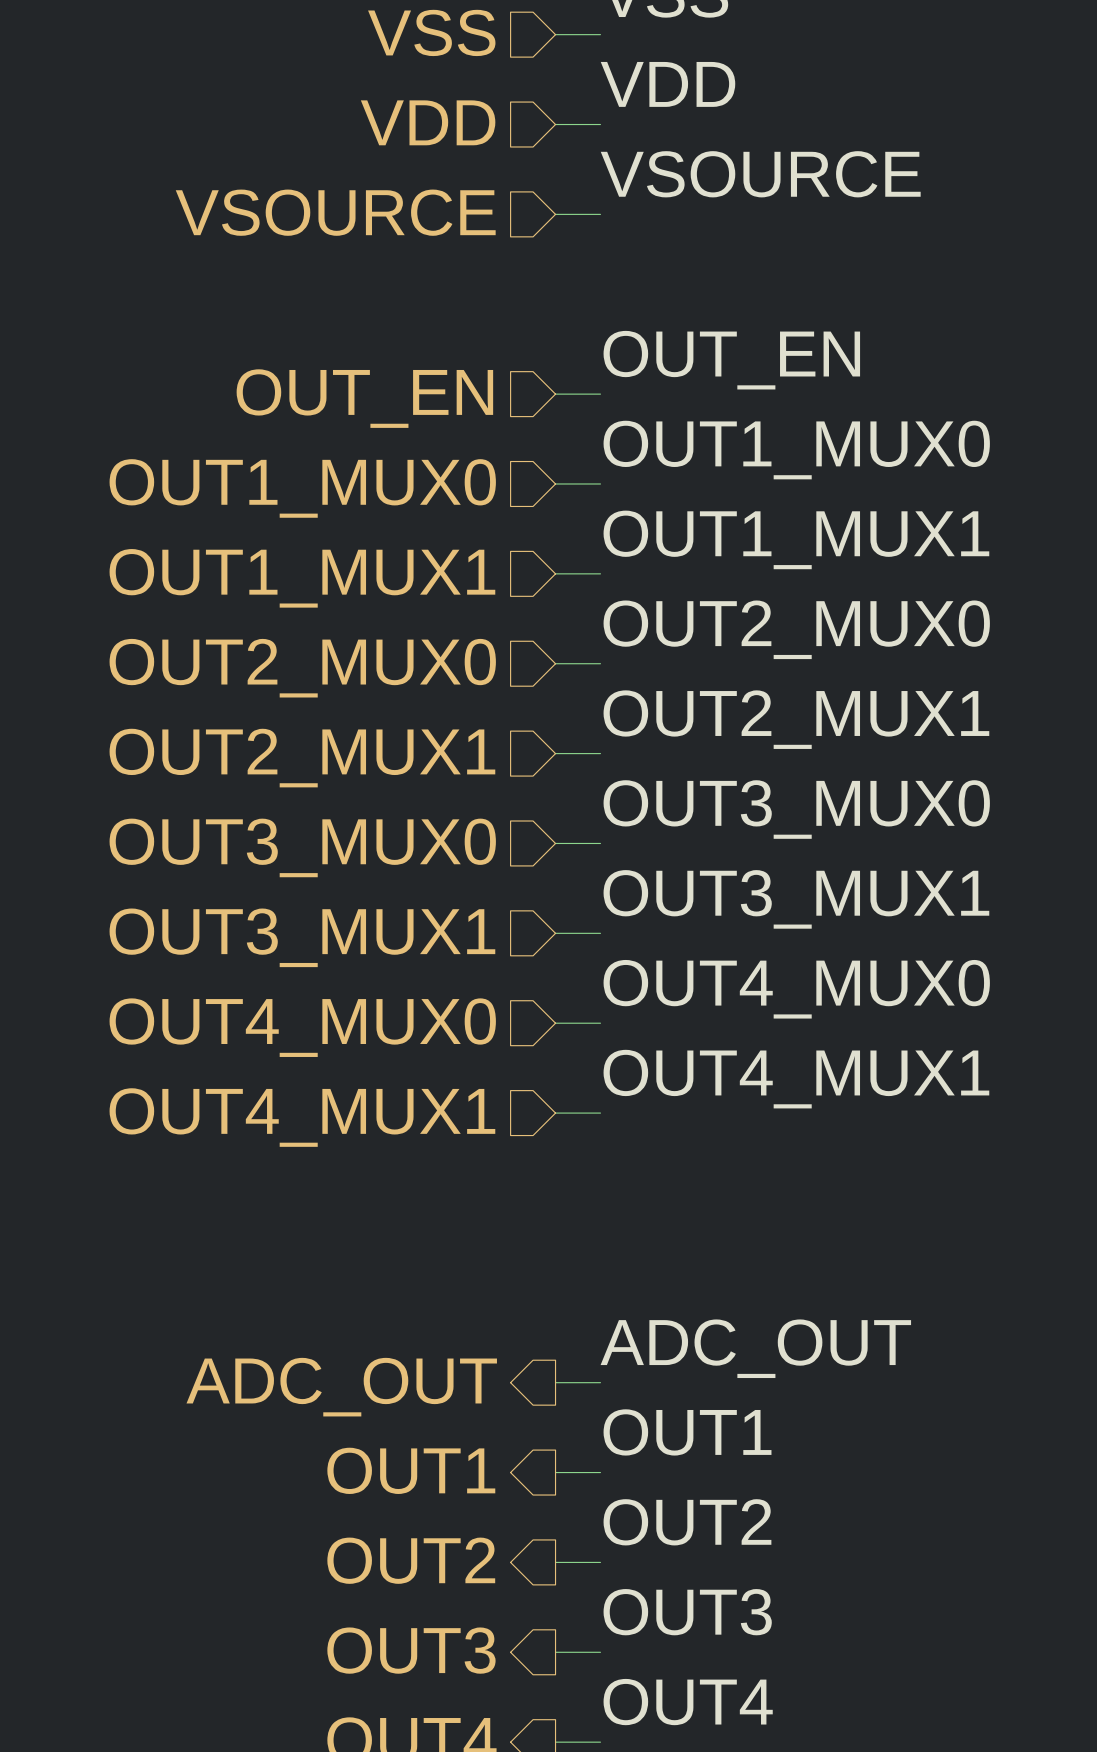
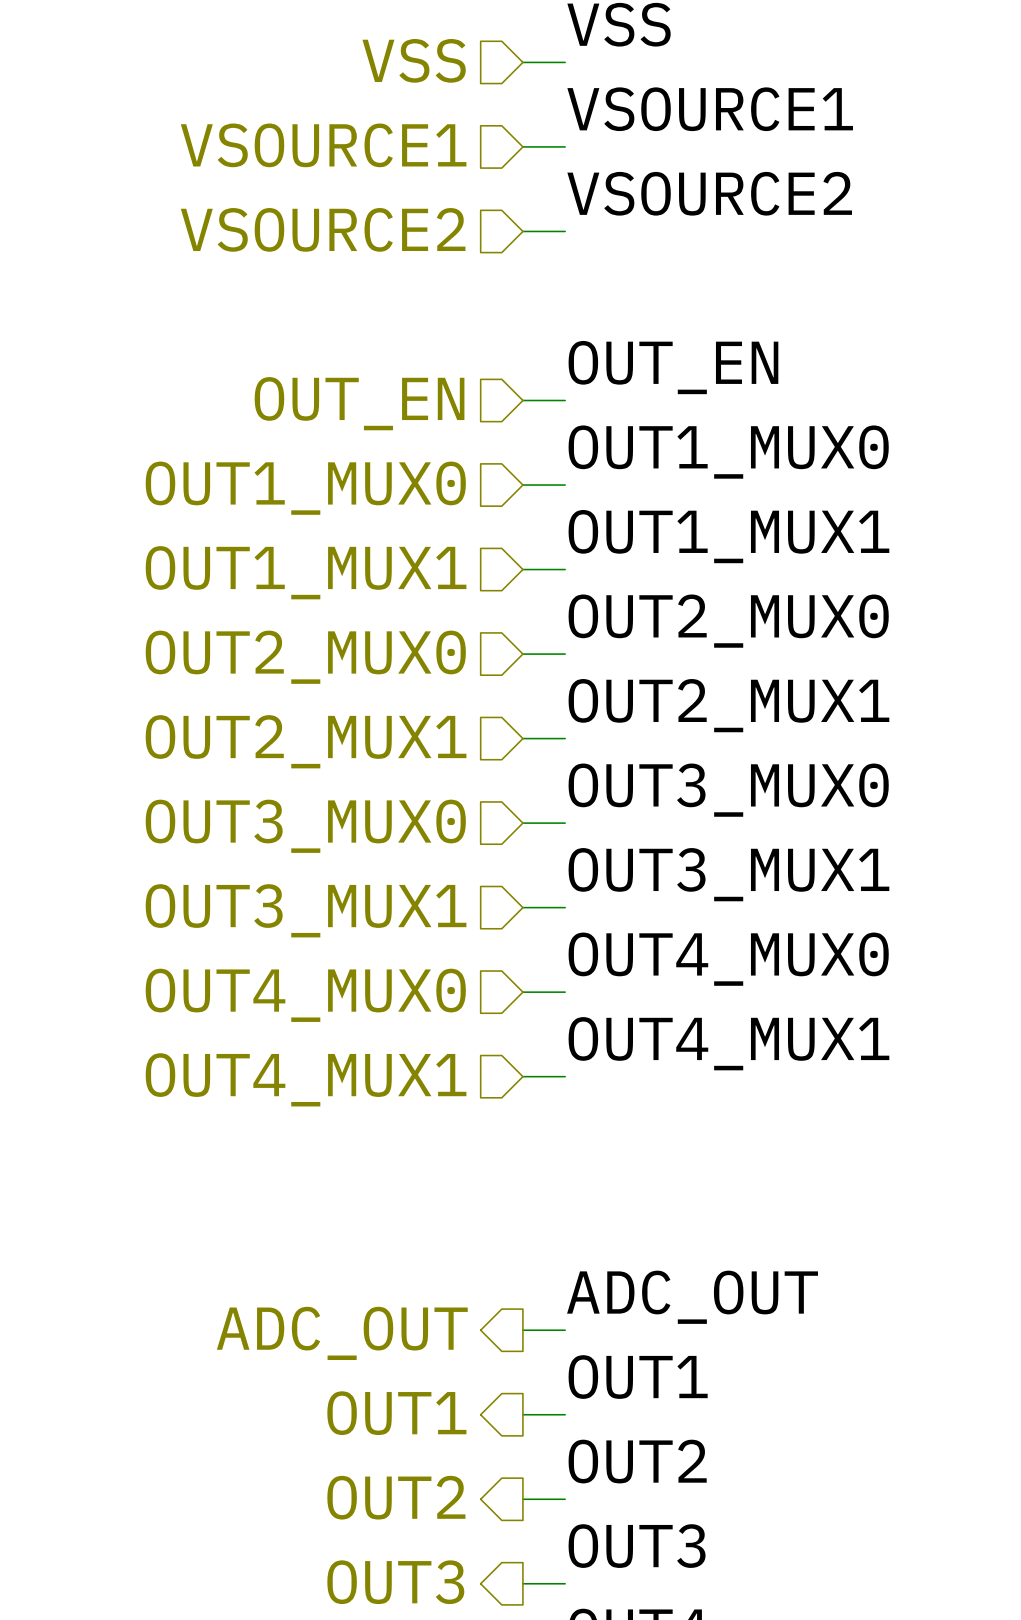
label: VDD (667, 84) -> VSOURCE1 (710, 109)
hierarchical label: VDD (428, 122) -> VSOURCE1 (323, 145)
label: VSOURCE (760, 174) -> VSOURCE2 (709, 193)
hierarchical label: VSOURCE (335, 212) -> VSOURCE2 (323, 229)

